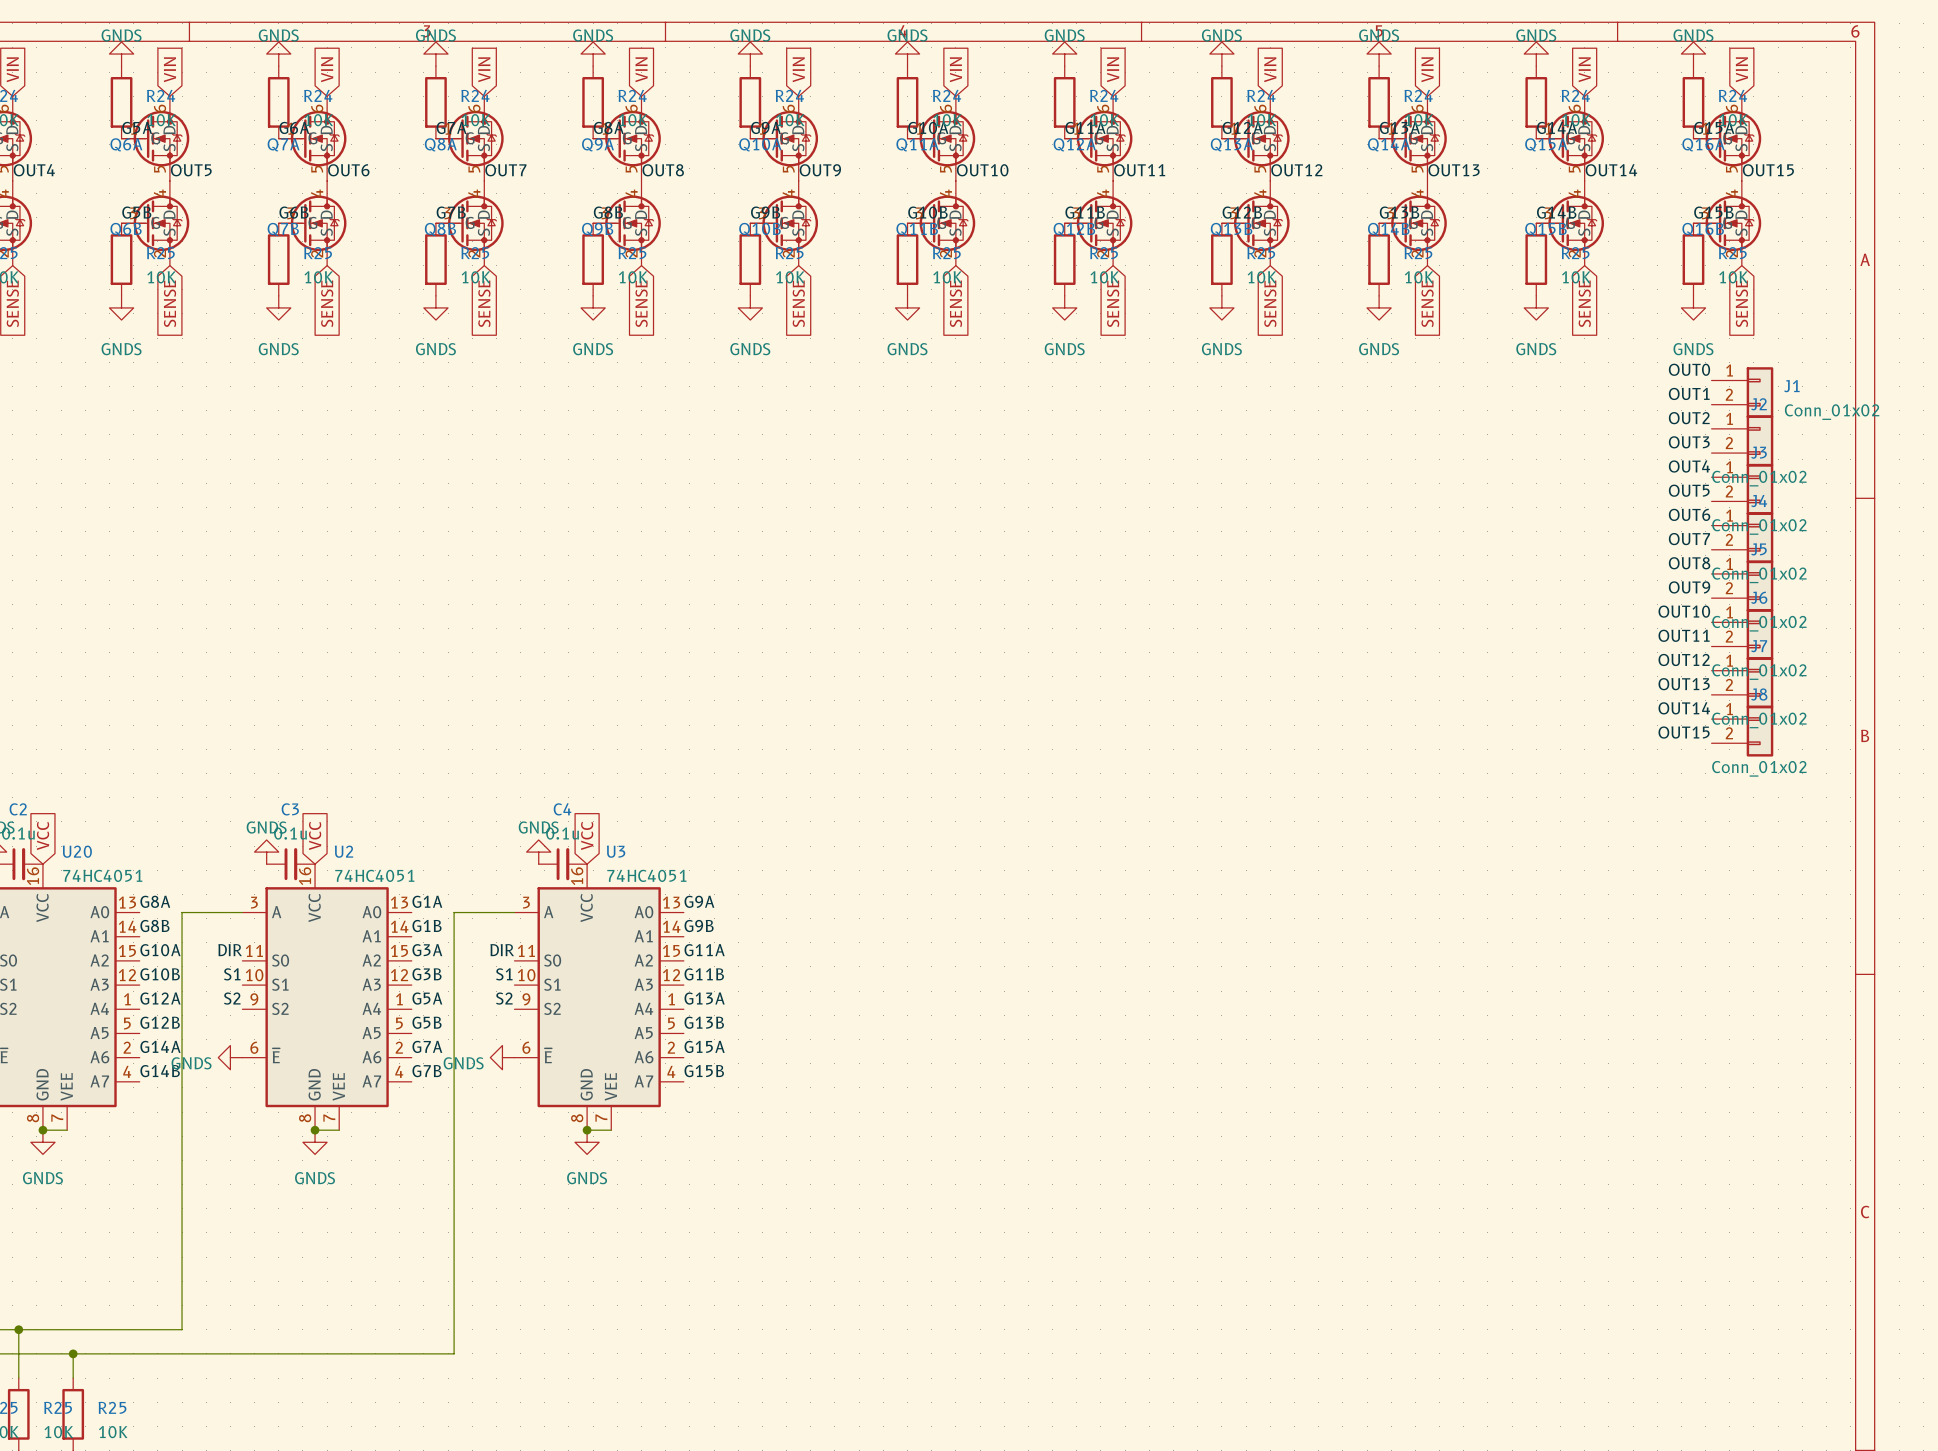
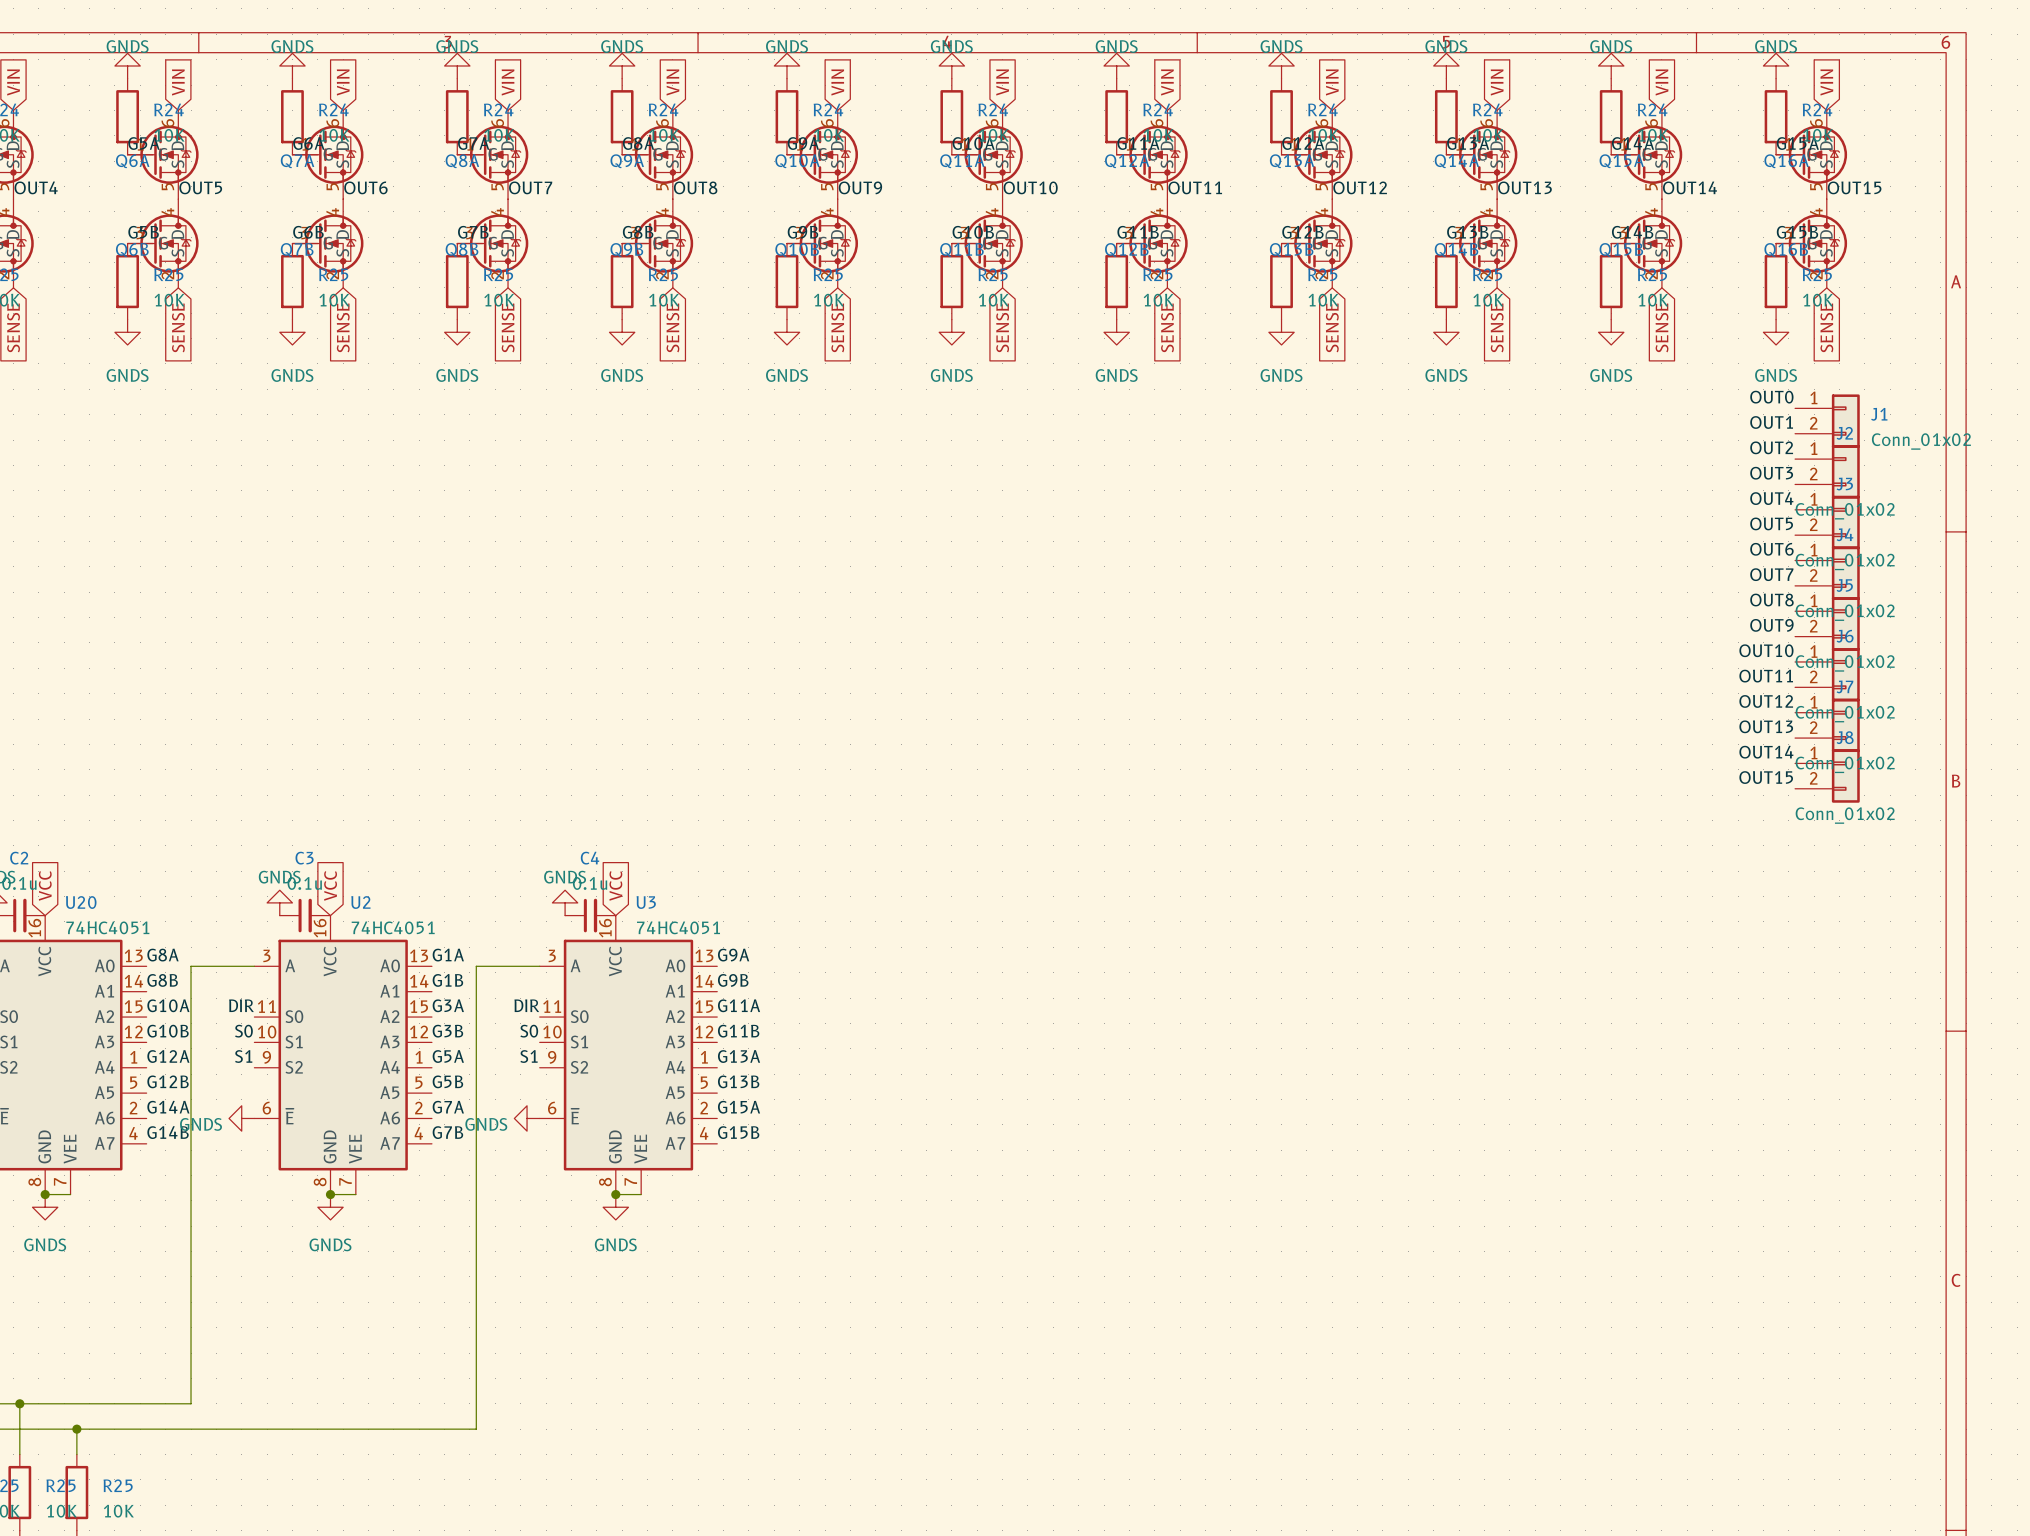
label: S1 (232, 974) -> S0 (243, 1031)
label: S1 (504, 974) -> S0 (529, 1031)
label: S2 (232, 998) -> S1 (243, 1056)
label: S2 (504, 998) -> S1 (529, 1056)

